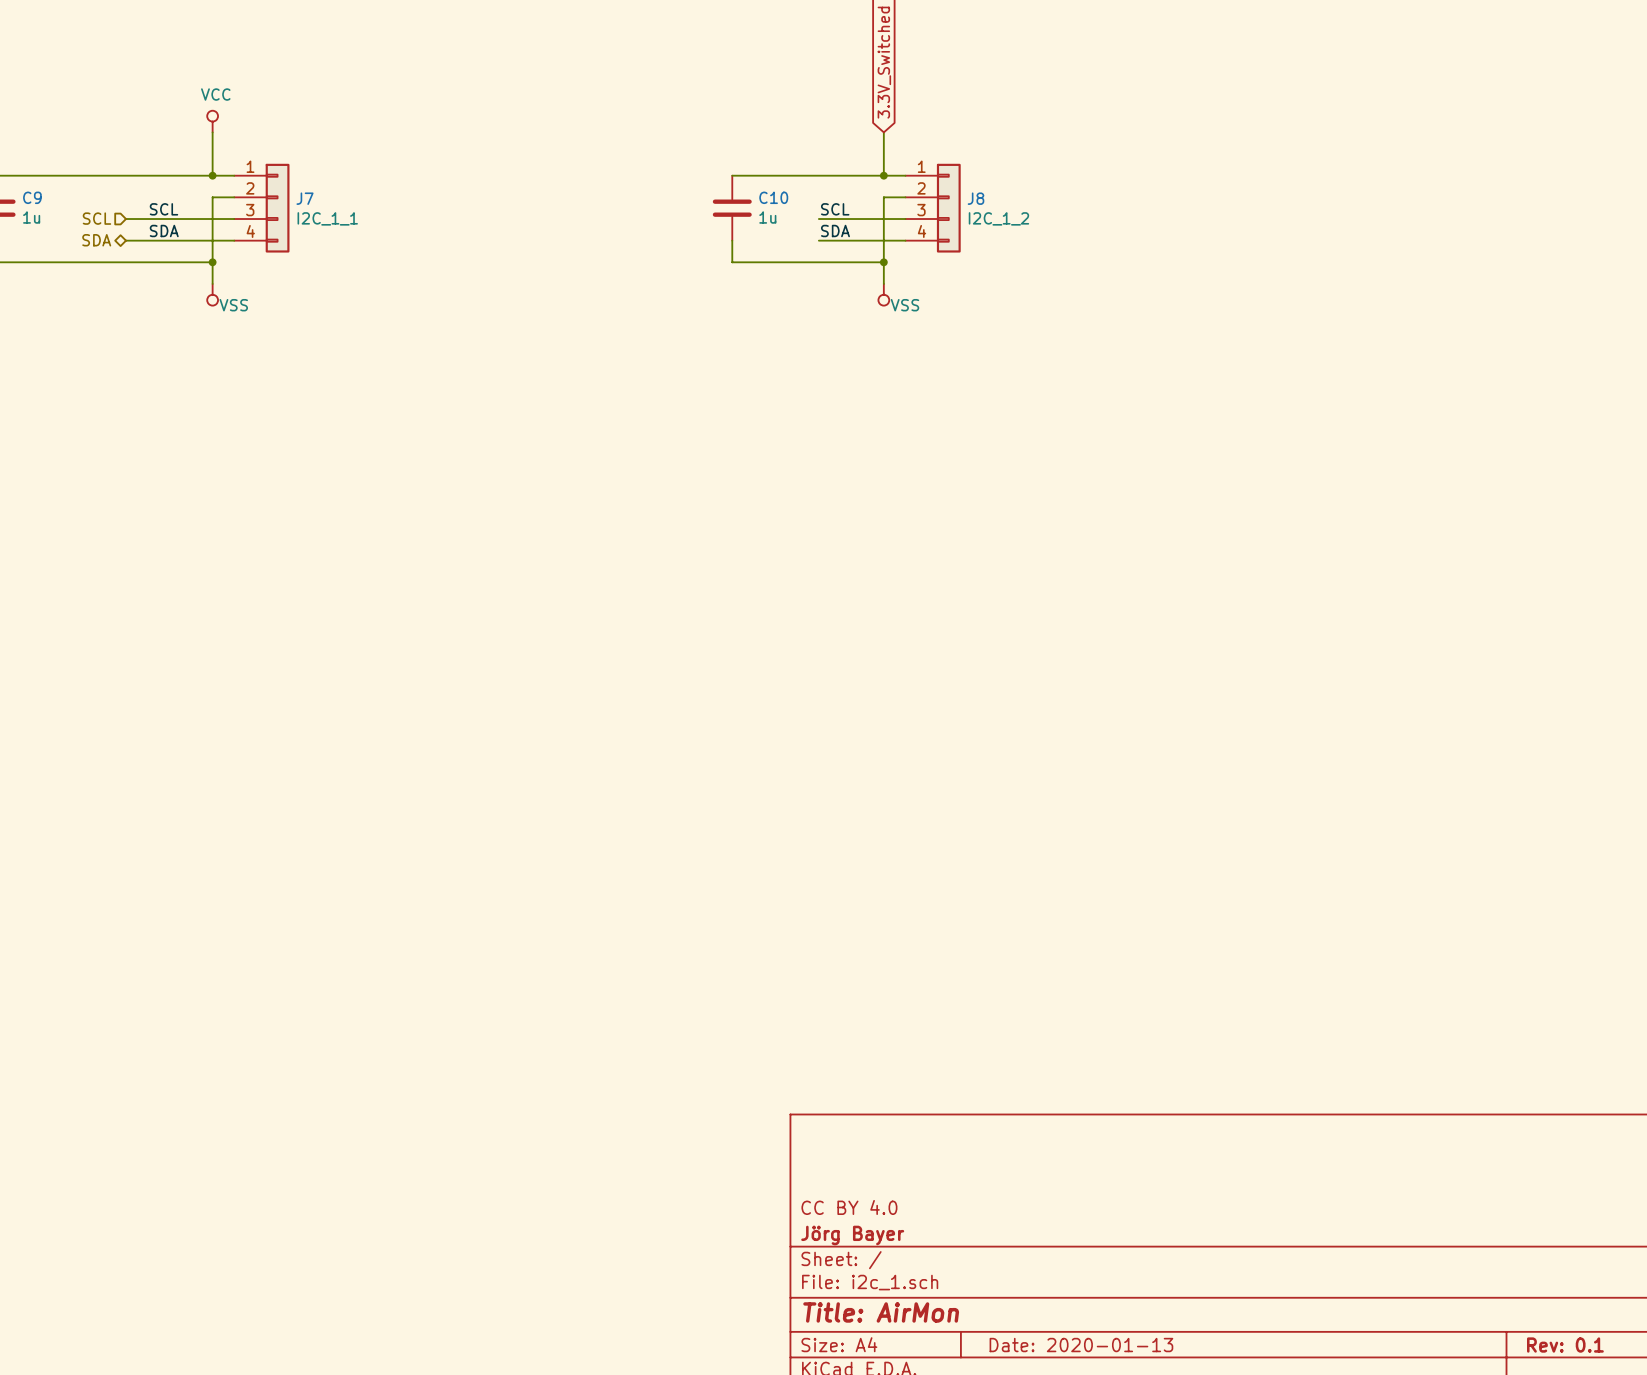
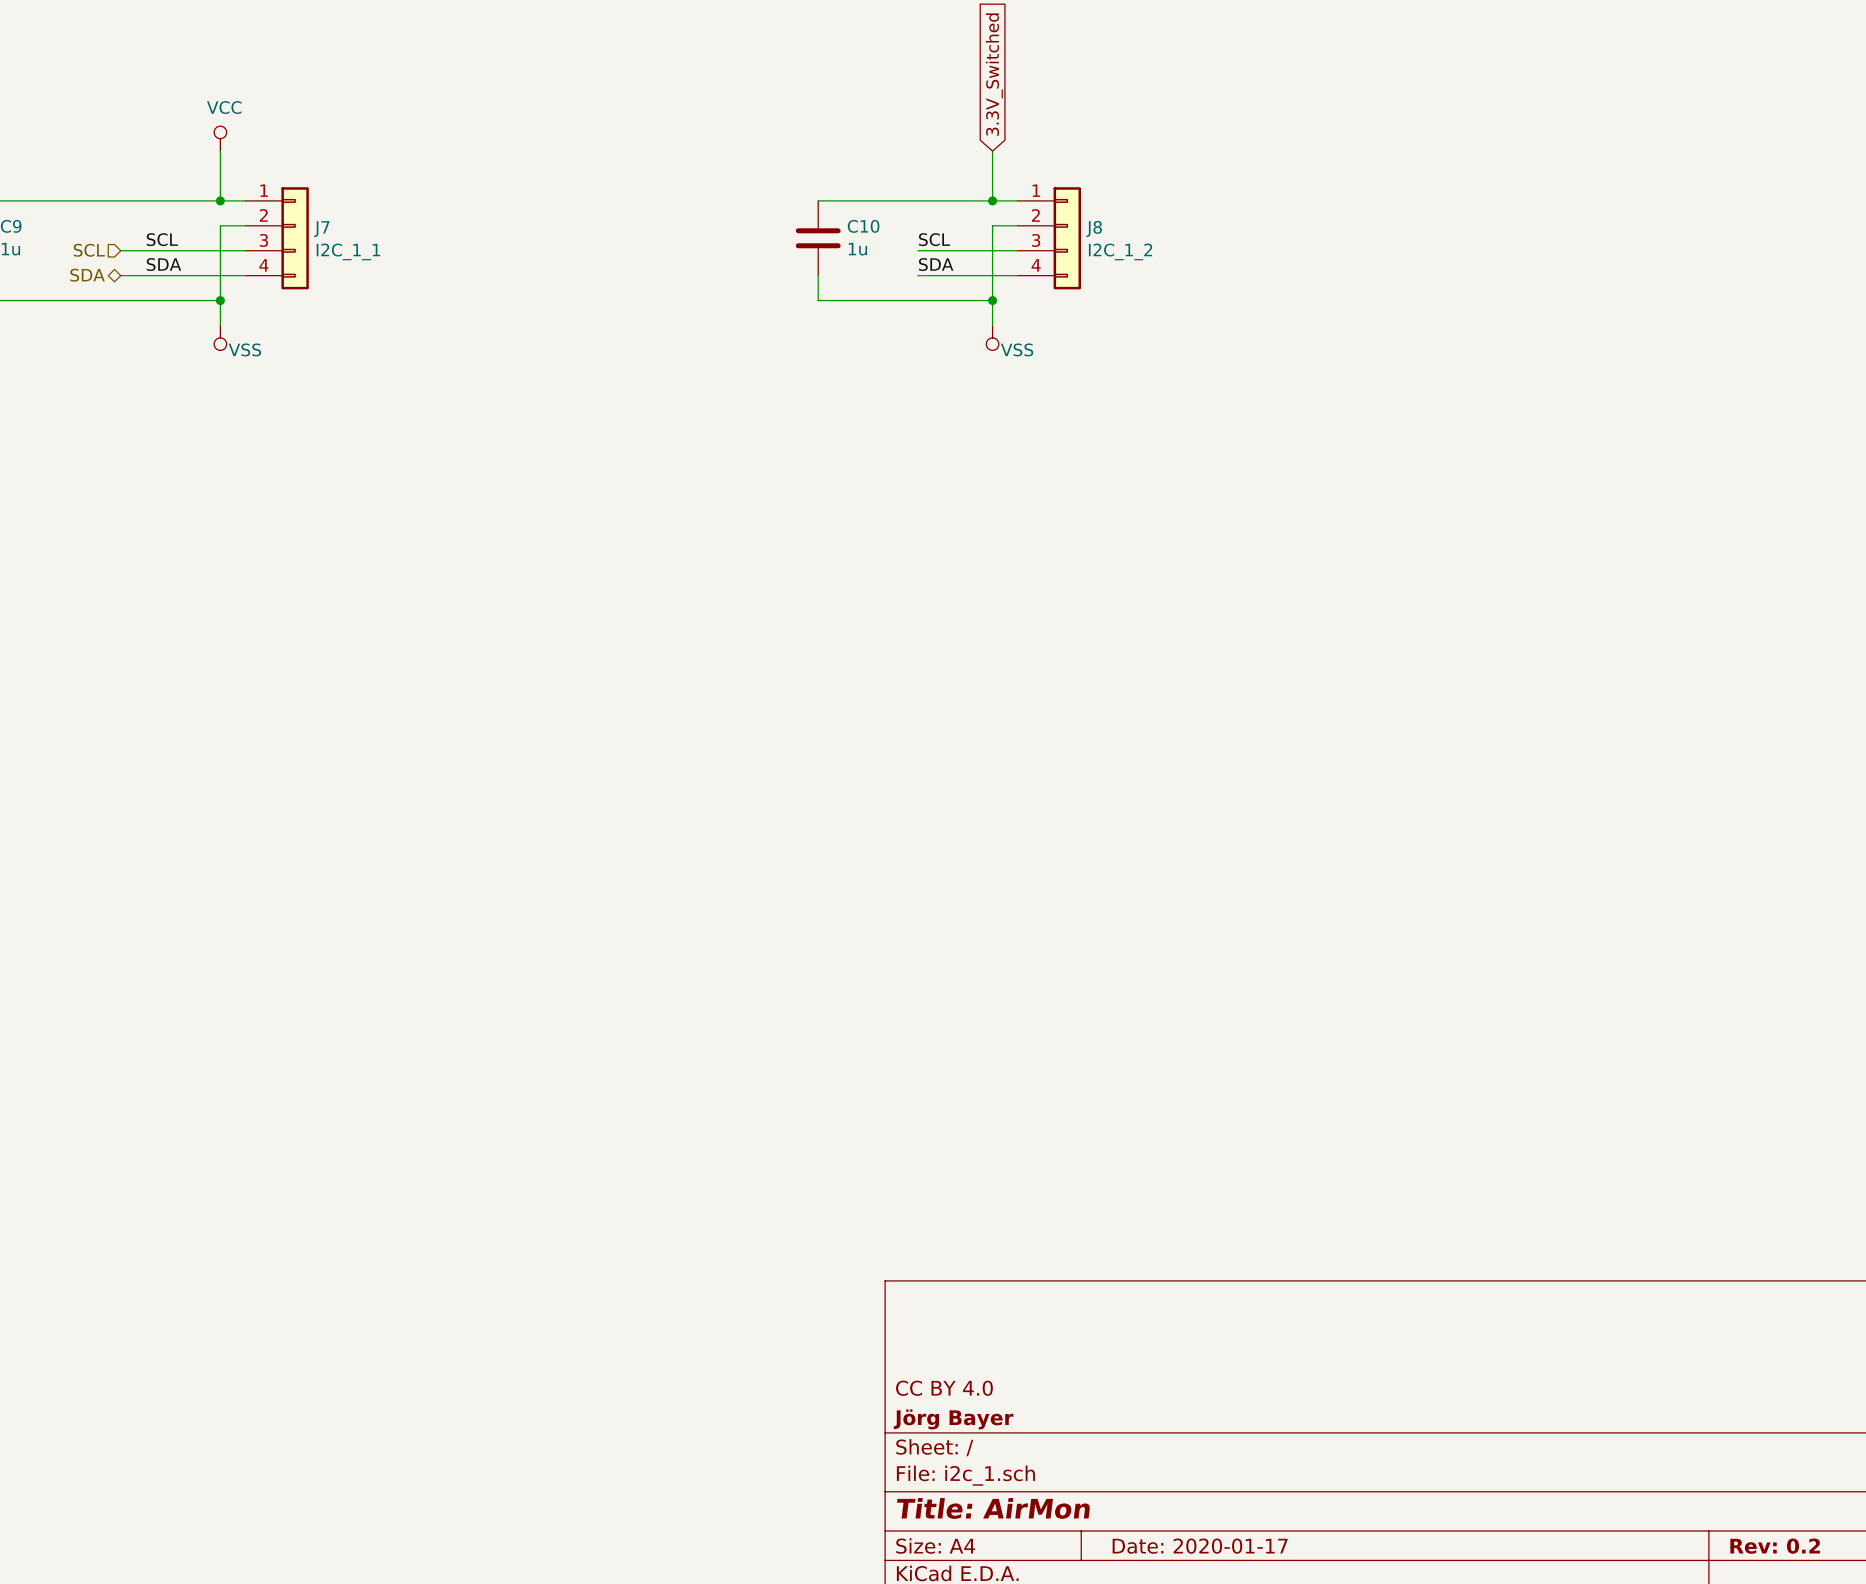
title block: Date: 2020-01-13 (1081, 1345) -> Date: 2020-01-17 (1200, 1546)
title block: Rev: 0.1 (1565, 1345) -> Rev: 0.2 (1775, 1546)

